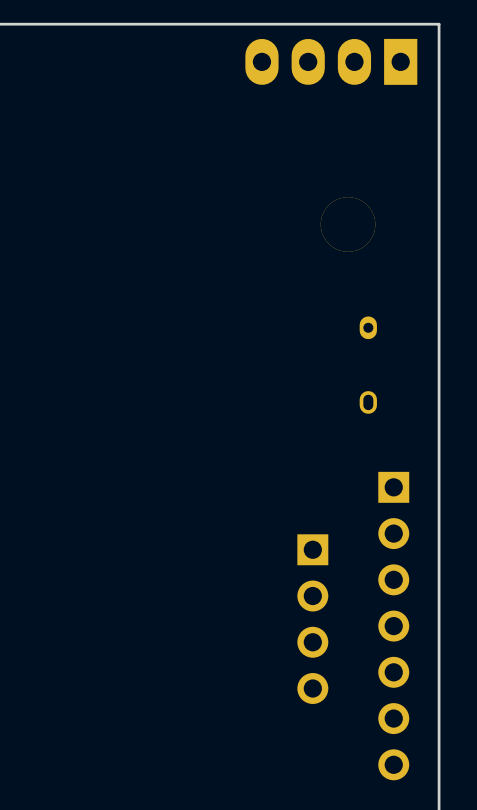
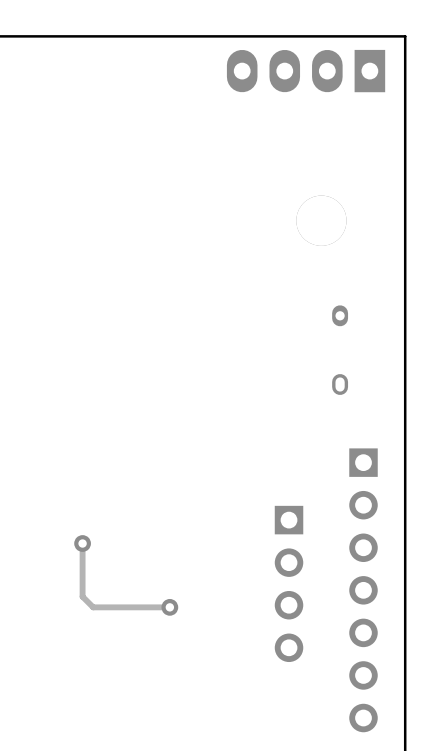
track: none -> (82, 543) (82, 596) (93, 607) (169, 607)
via: none -> (82, 543)
via: none -> (169, 607)

